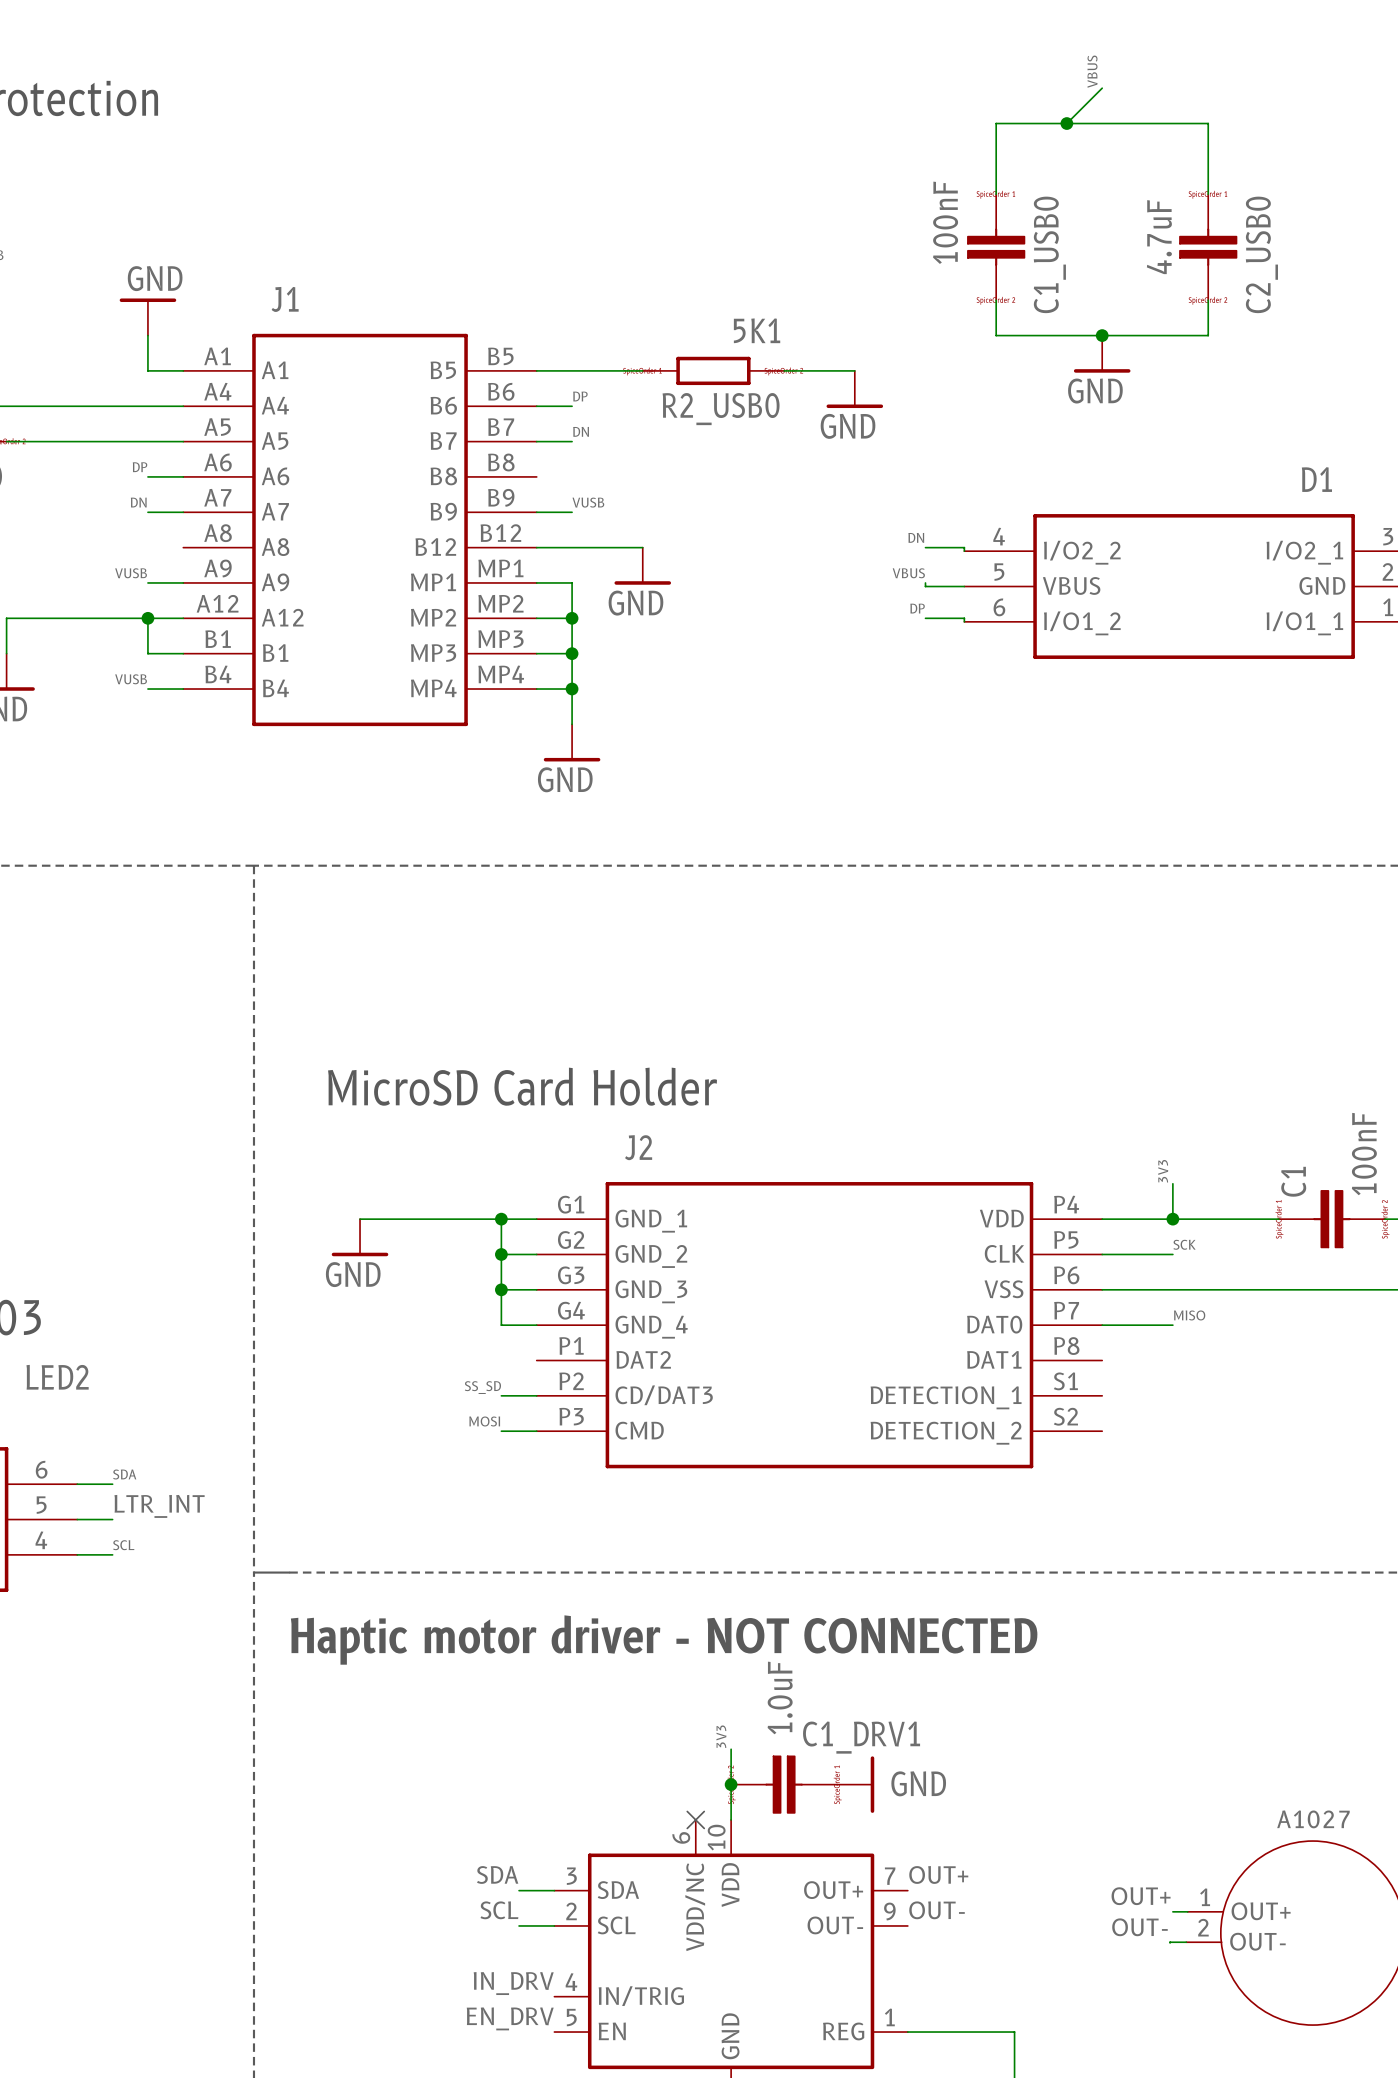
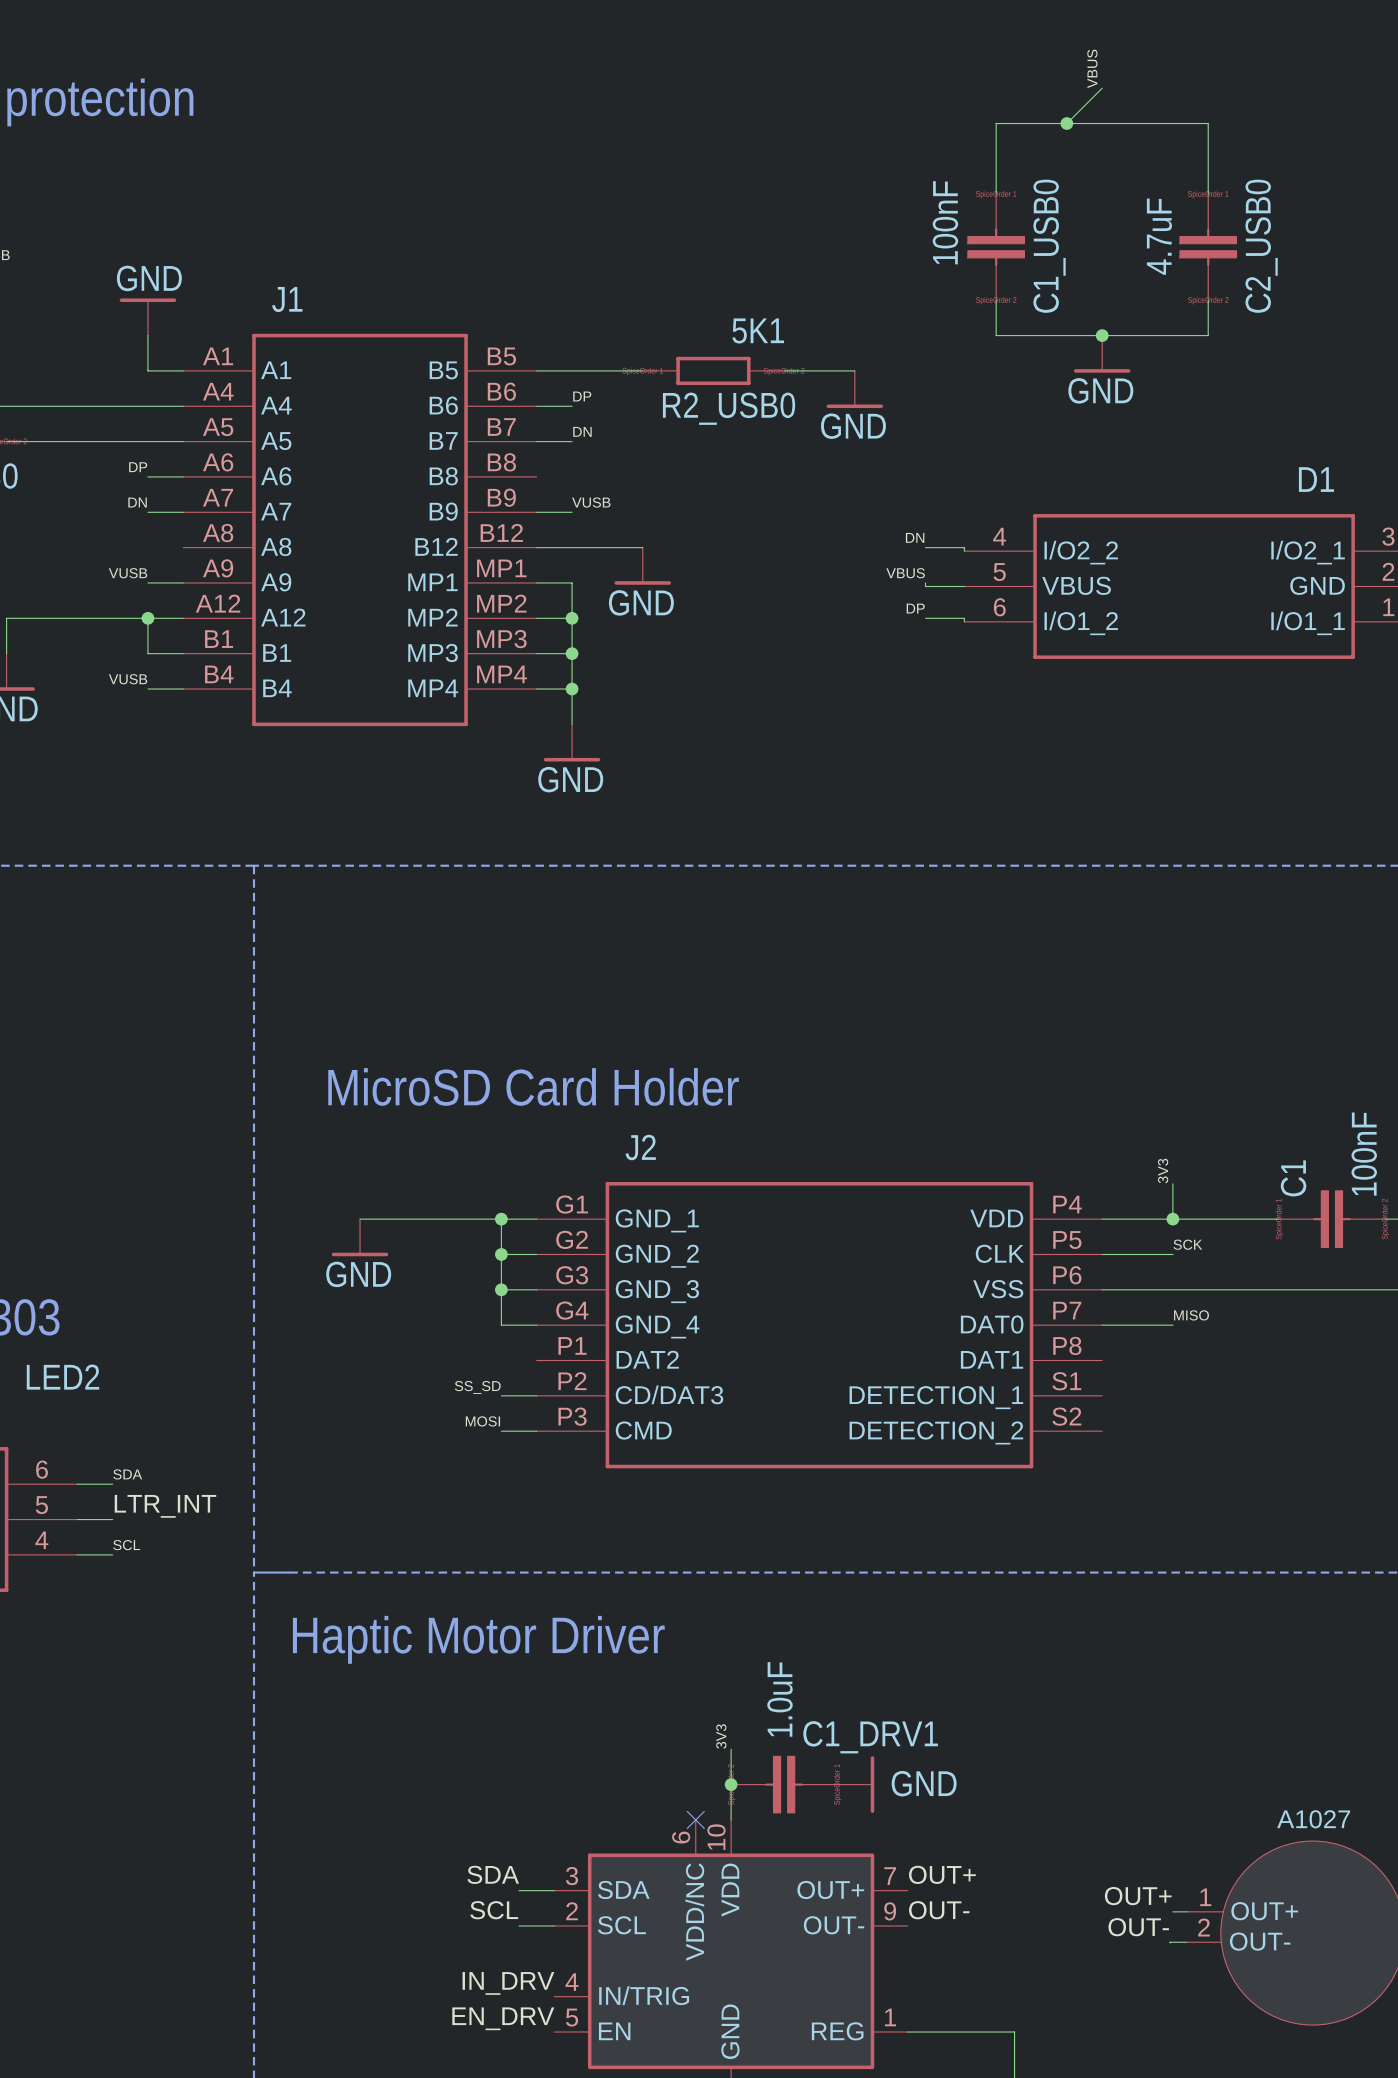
text: Haptic motor driver - NOT CONNECTED (664, 1640) -> Haptic Motor Driver (478, 1639)

